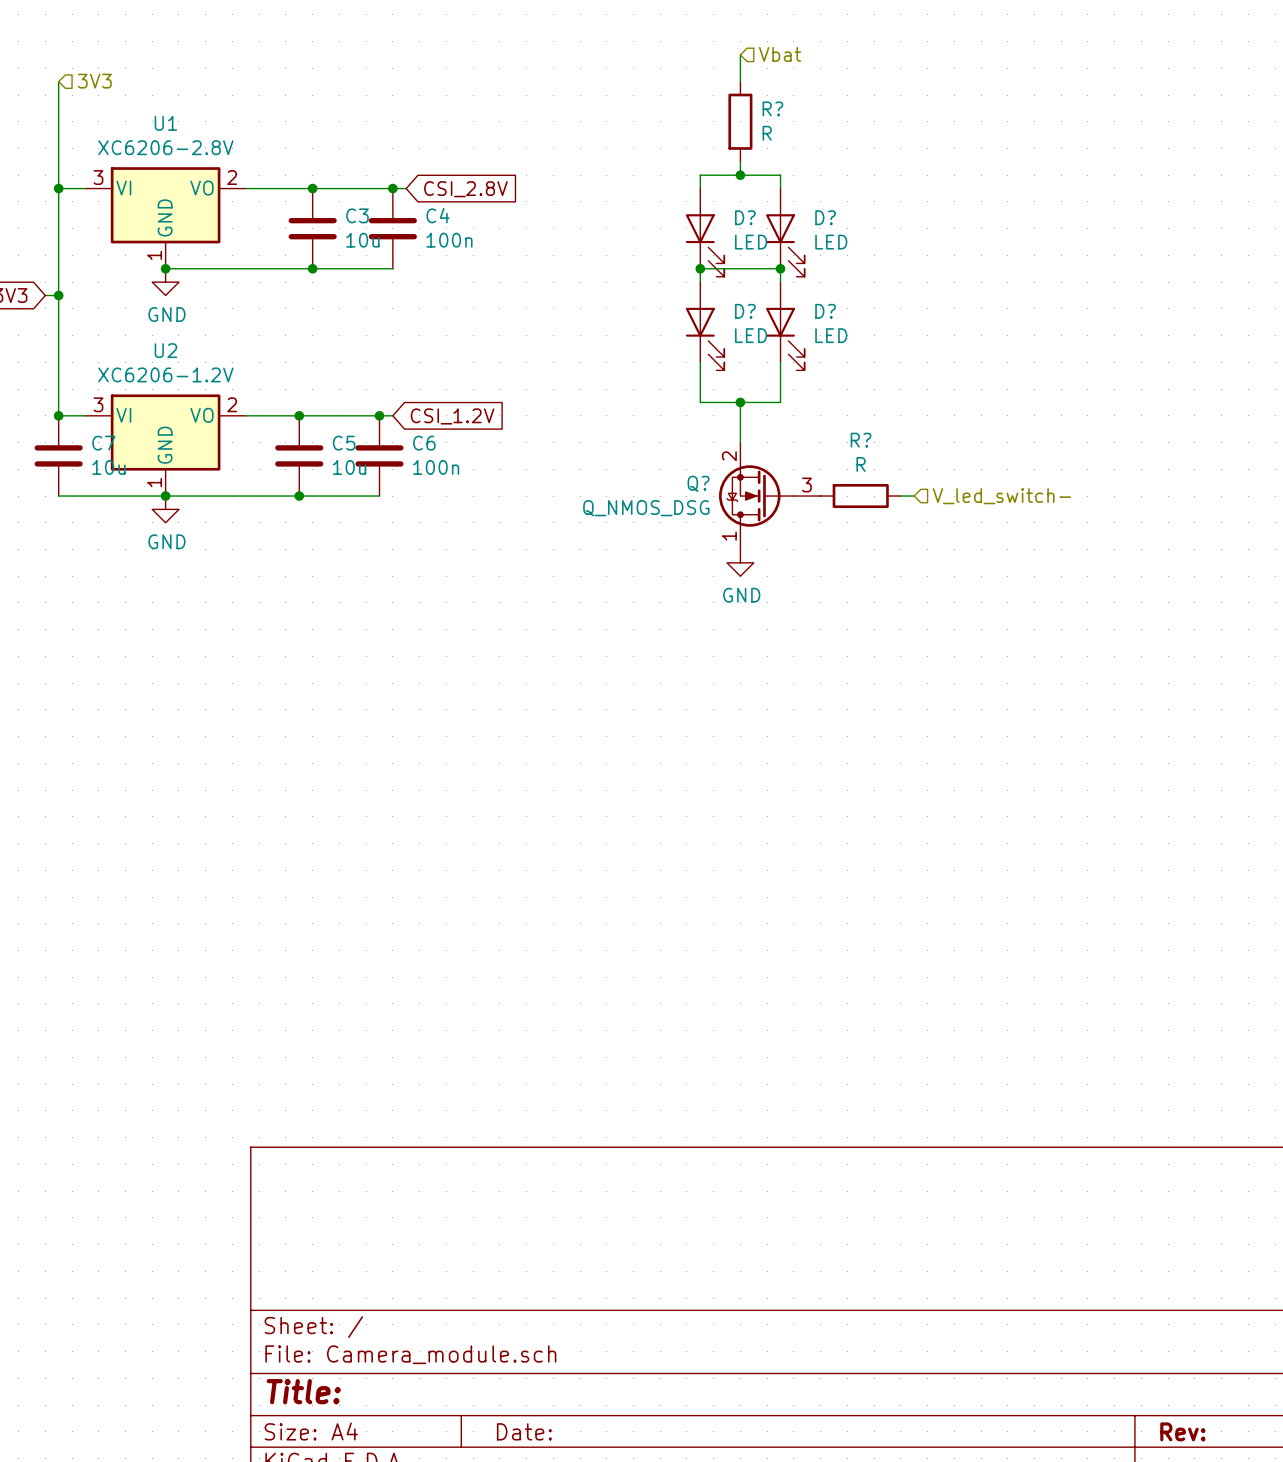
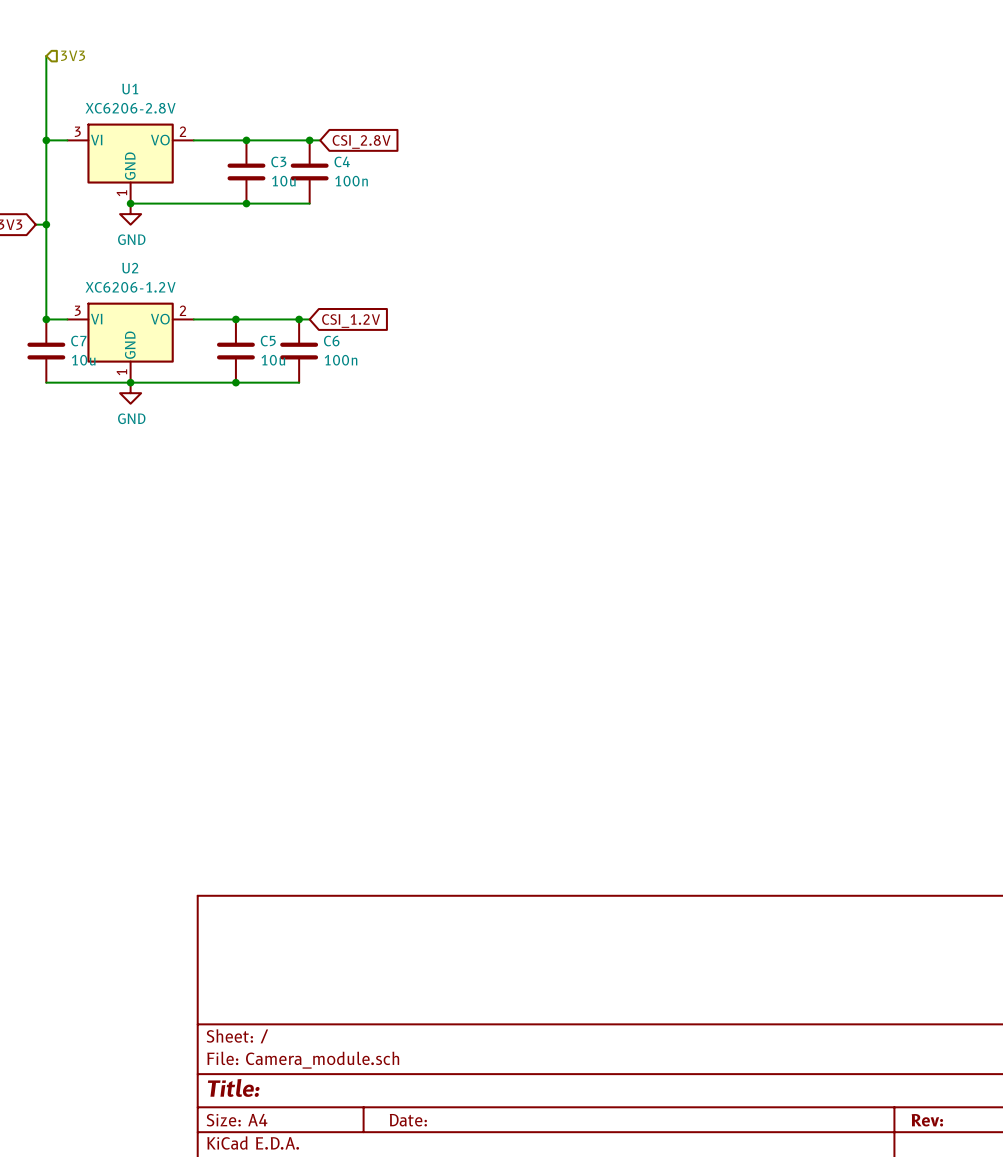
wire: (740, 54) (740, 81) -> none
hierarchical label: Vbat (780, 54) -> none
R?: R (740, 121) -> none
wire: (740, 161) (740, 175) -> none
junction: (740, 175) -> none
wire: (700, 188) (700, 175) (780, 175) (780, 188) -> none
D?: LED (705, 232) -> none
D?: LED (785, 232) -> none
junction: (700, 268) -> none
junction: (780, 268) -> none
wire: (700, 282) (700, 268) (780, 268) (780, 282) -> none
D?: LED (705, 326) -> none
D?: LED (785, 326) -> none
wire: (700, 362) (700, 402) (780, 402) (780, 362) -> none
wire: (740, 402) (740, 442) -> none
junction: (740, 402) -> none
Q?: Q_NMOS_DSG (769, 496) -> none
R?: R (860, 496) -> none
wire: (900, 496) (914, 496) -> none
hierarchical label: V_led_switch- (1001, 496) -> none
power symbol: GND (740, 562) -> none

